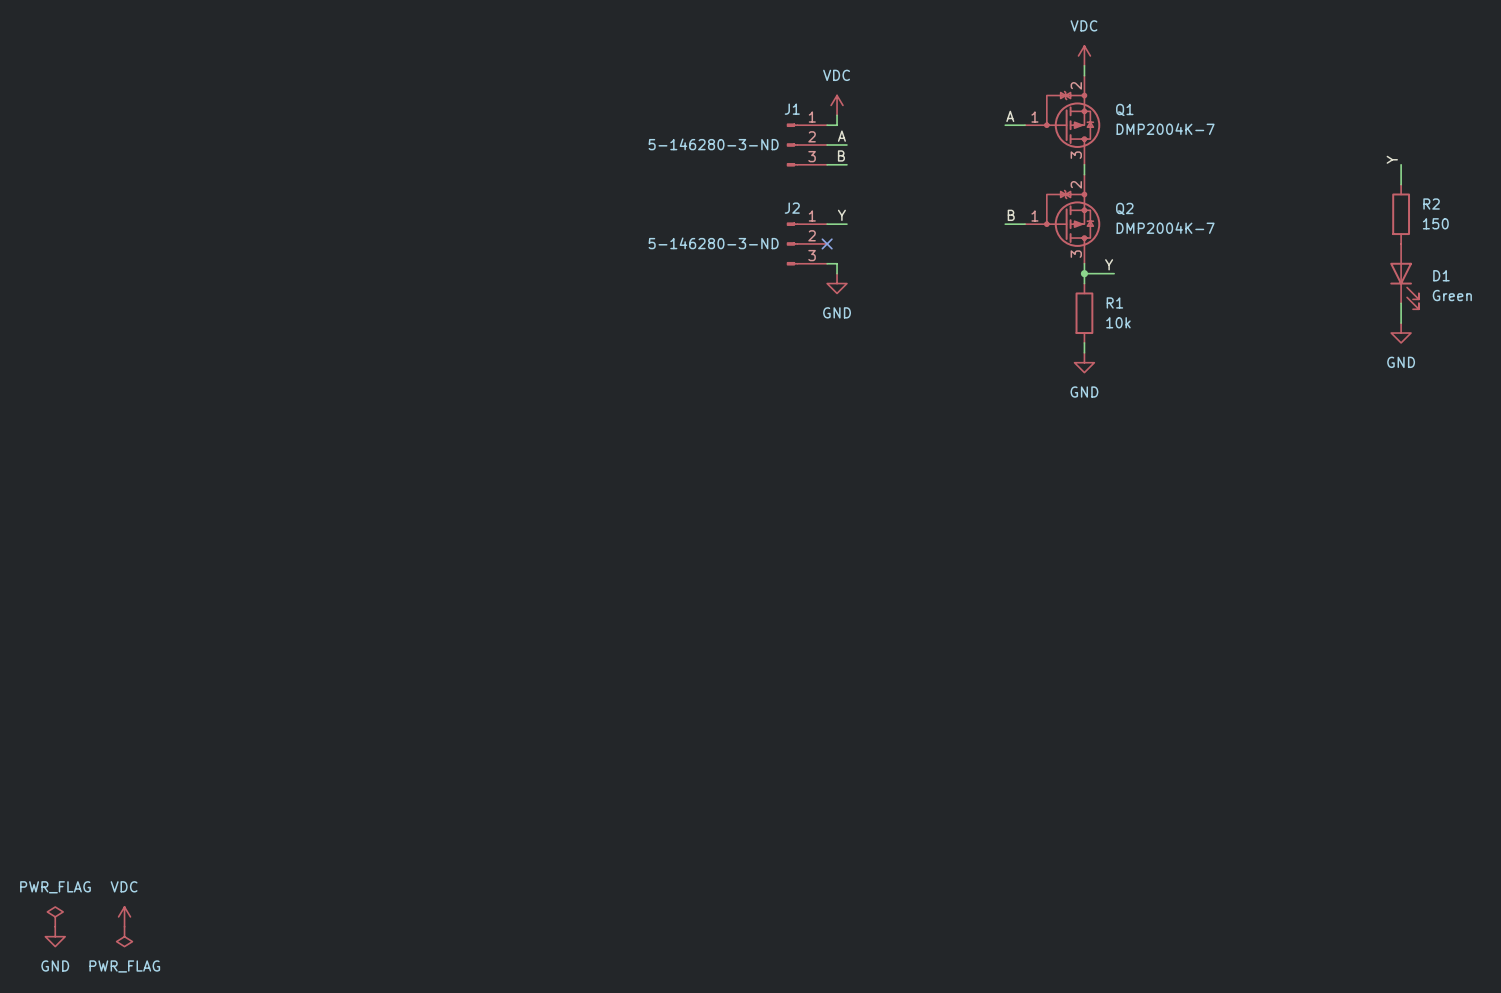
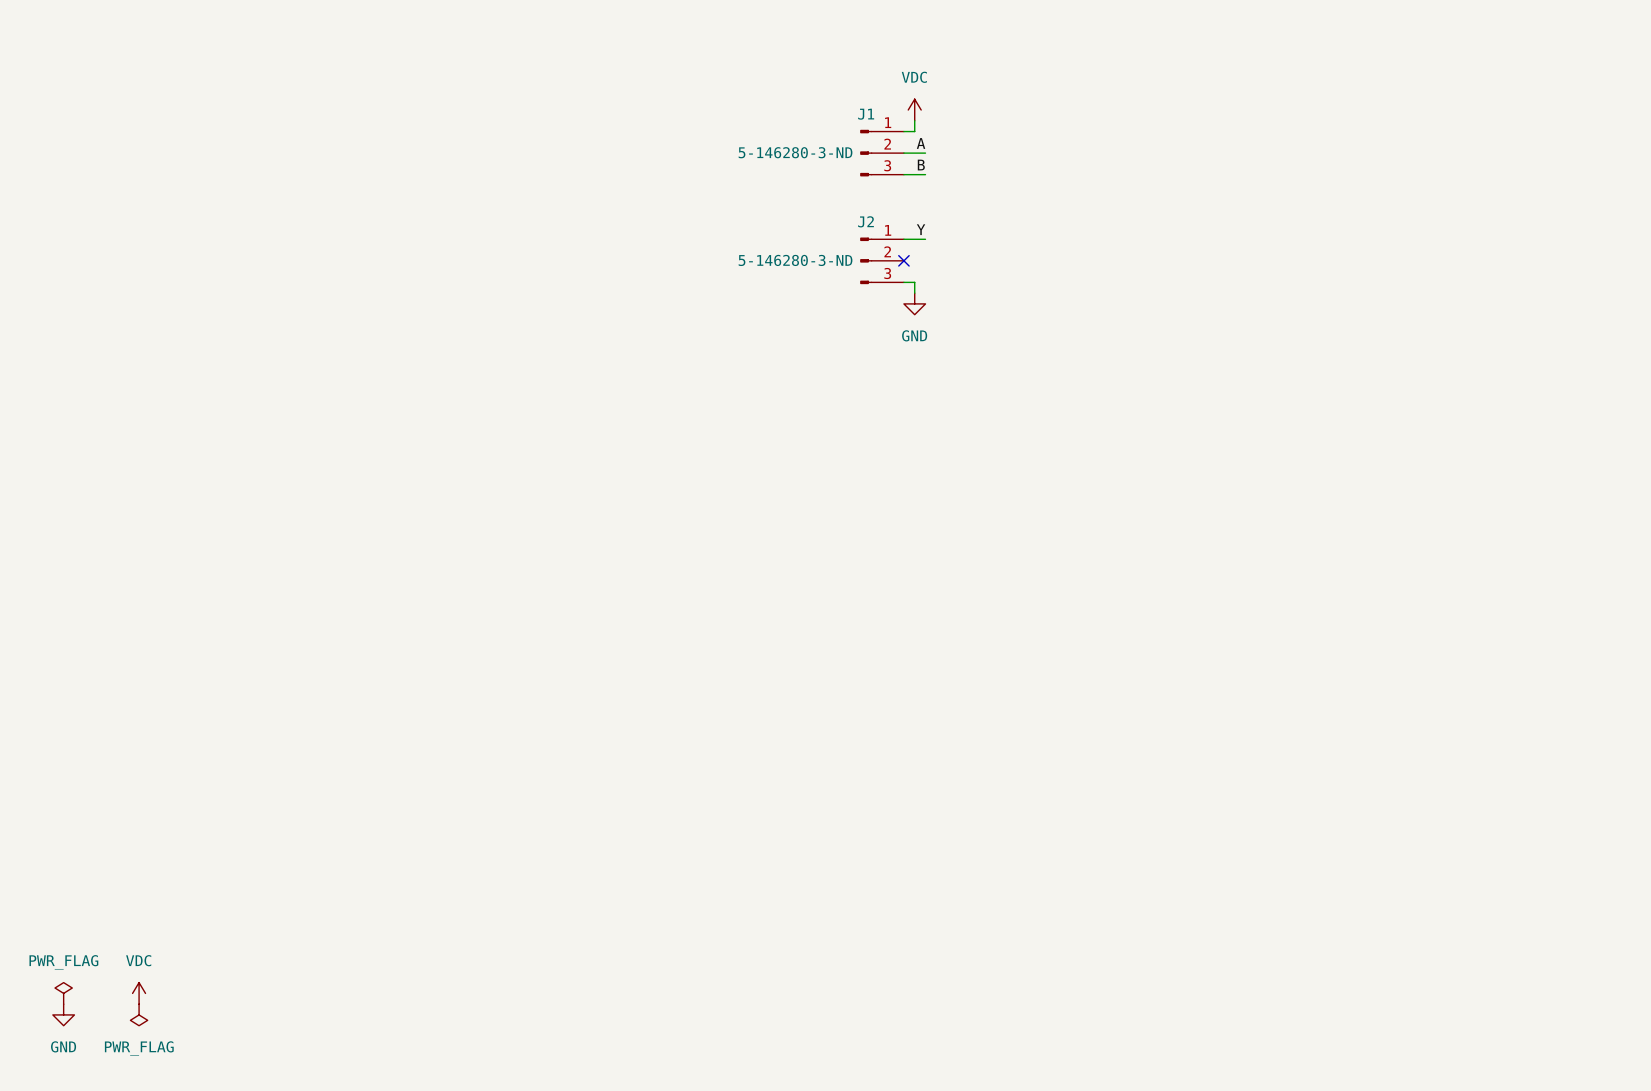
power symbol: VDC (1084, 55) -> none
wire: (1084, 65) (1084, 75) -> none
label: A (1010, 116) -> none
Q1: DMP2004K-7 (1062, 120) -> none
wire: (1005, 125) (1025, 125) -> none
label: Y (1392, 159) -> none
wire: (1084, 164) (1084, 174) -> none
wire: (1401, 164) (1401, 184) -> none
R2: 150 (1401, 214) -> none
label: B (1011, 215) -> none
Q2: DMP2004K-7 (1062, 219) -> none
wire: (1005, 224) (1025, 224) -> none
wire: (1084, 263) (1084, 283) -> none
label: Y (1109, 264) -> none
wire: (1084, 273) (1114, 273) -> none
junction: (1084, 273) -> none
D1: Green (1404, 276) -> none
wire: (1401, 303) (1401, 323) -> none
R1: 10k (1084, 313) -> none
power symbol: GND (1401, 333) -> none
wire: (1084, 342) (1084, 352) -> none
power symbol: GND (1084, 362) -> none

